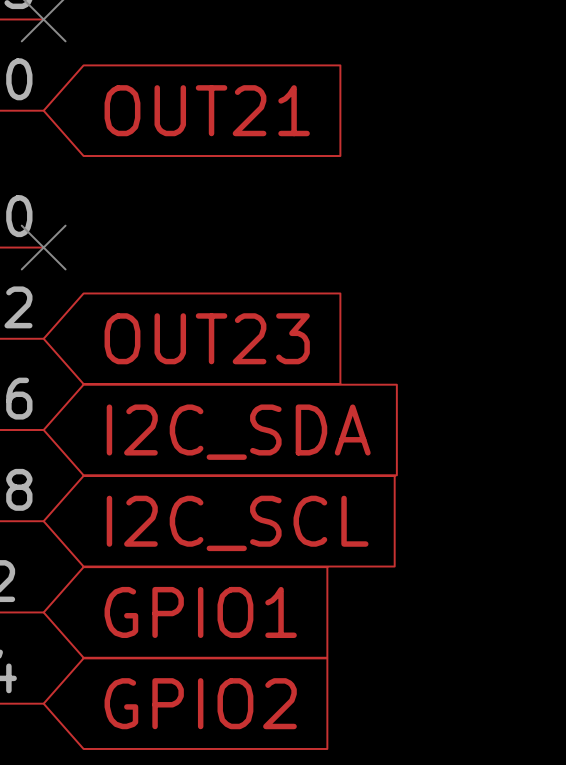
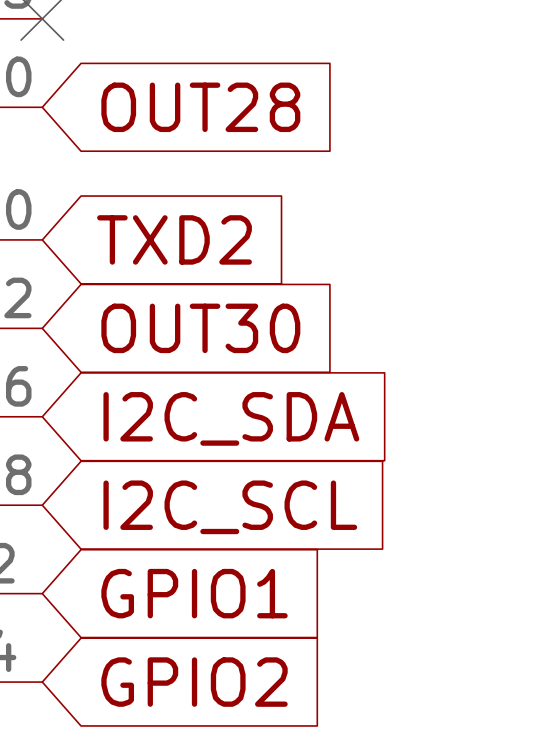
global label: OUT21 (207, 110) -> OUT28 (200, 107)
no-connect mark: (43, 247) -> none
global label: none -> TXD2 (174, 239)
global label: OUT23 (207, 338) -> OUT30 (200, 328)

